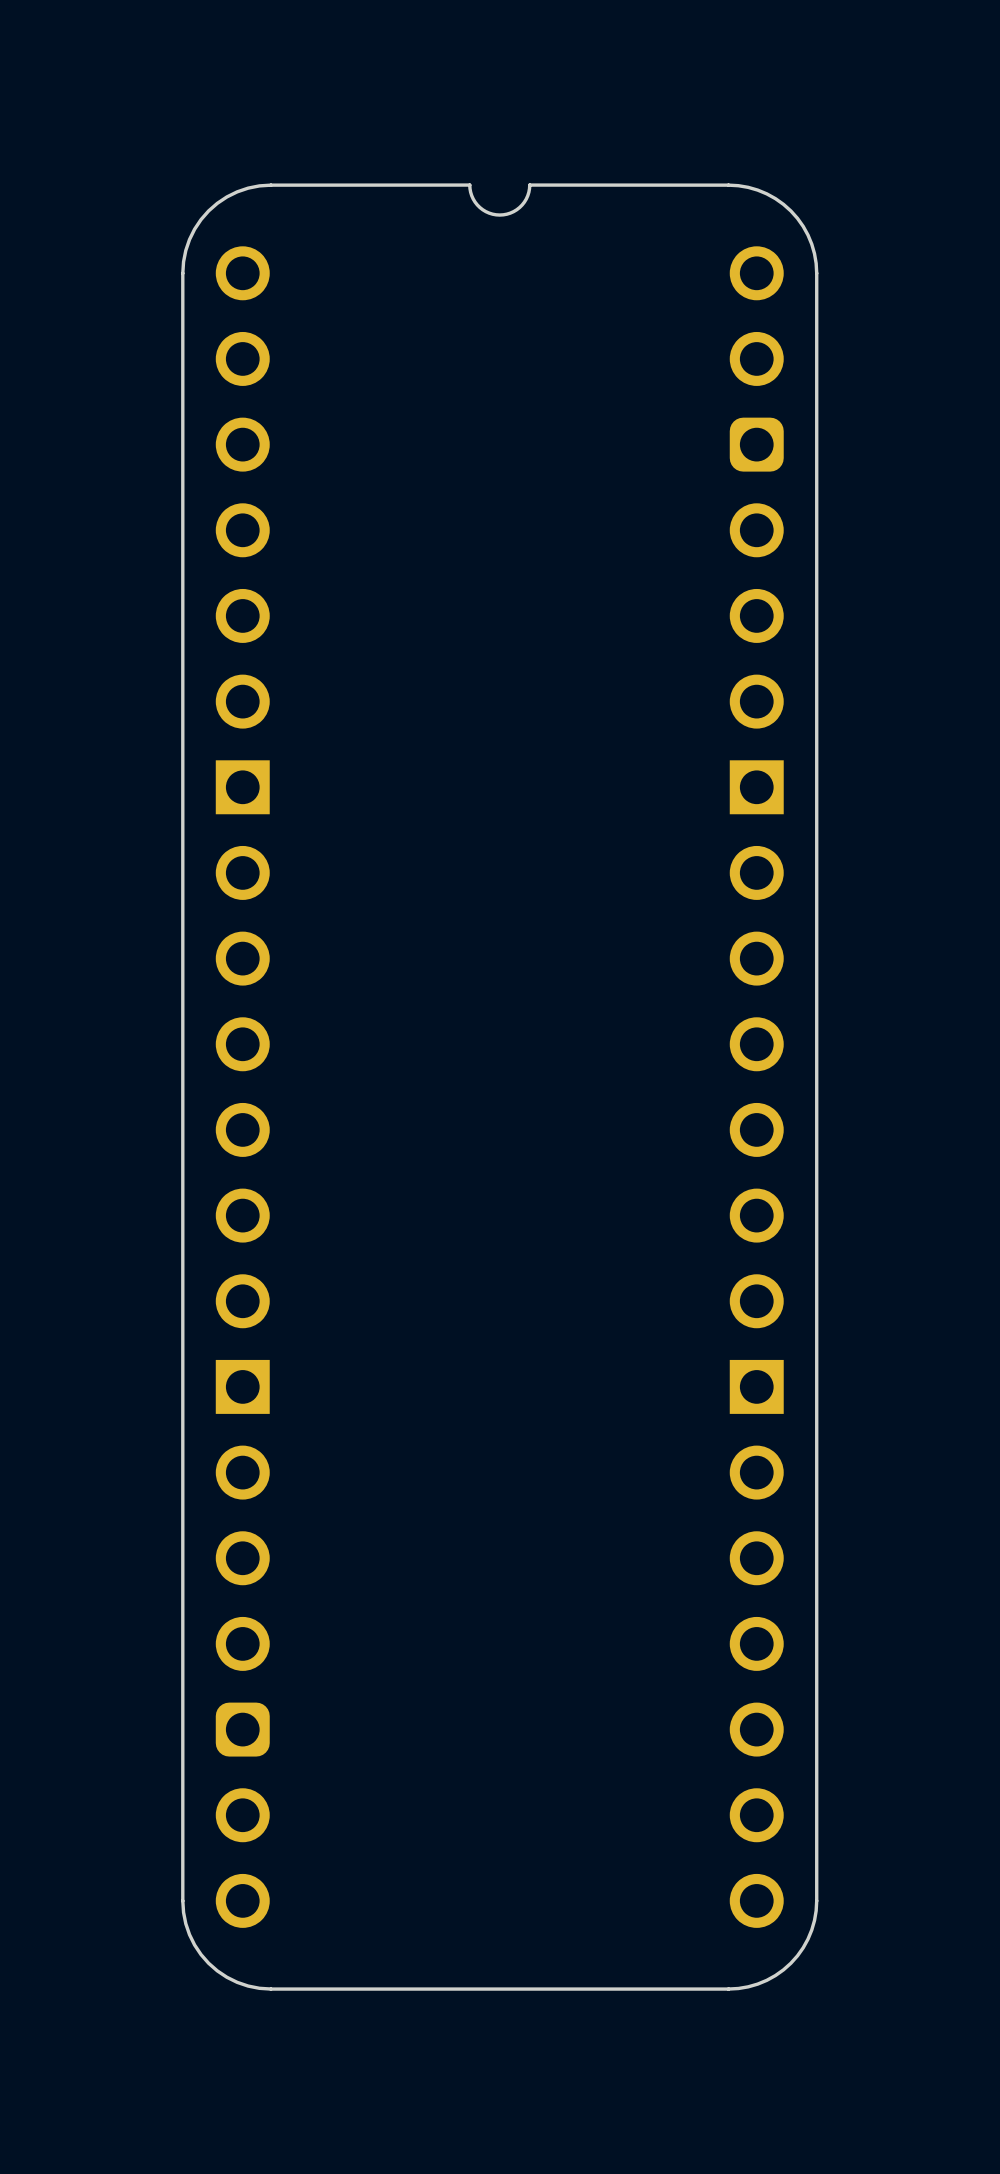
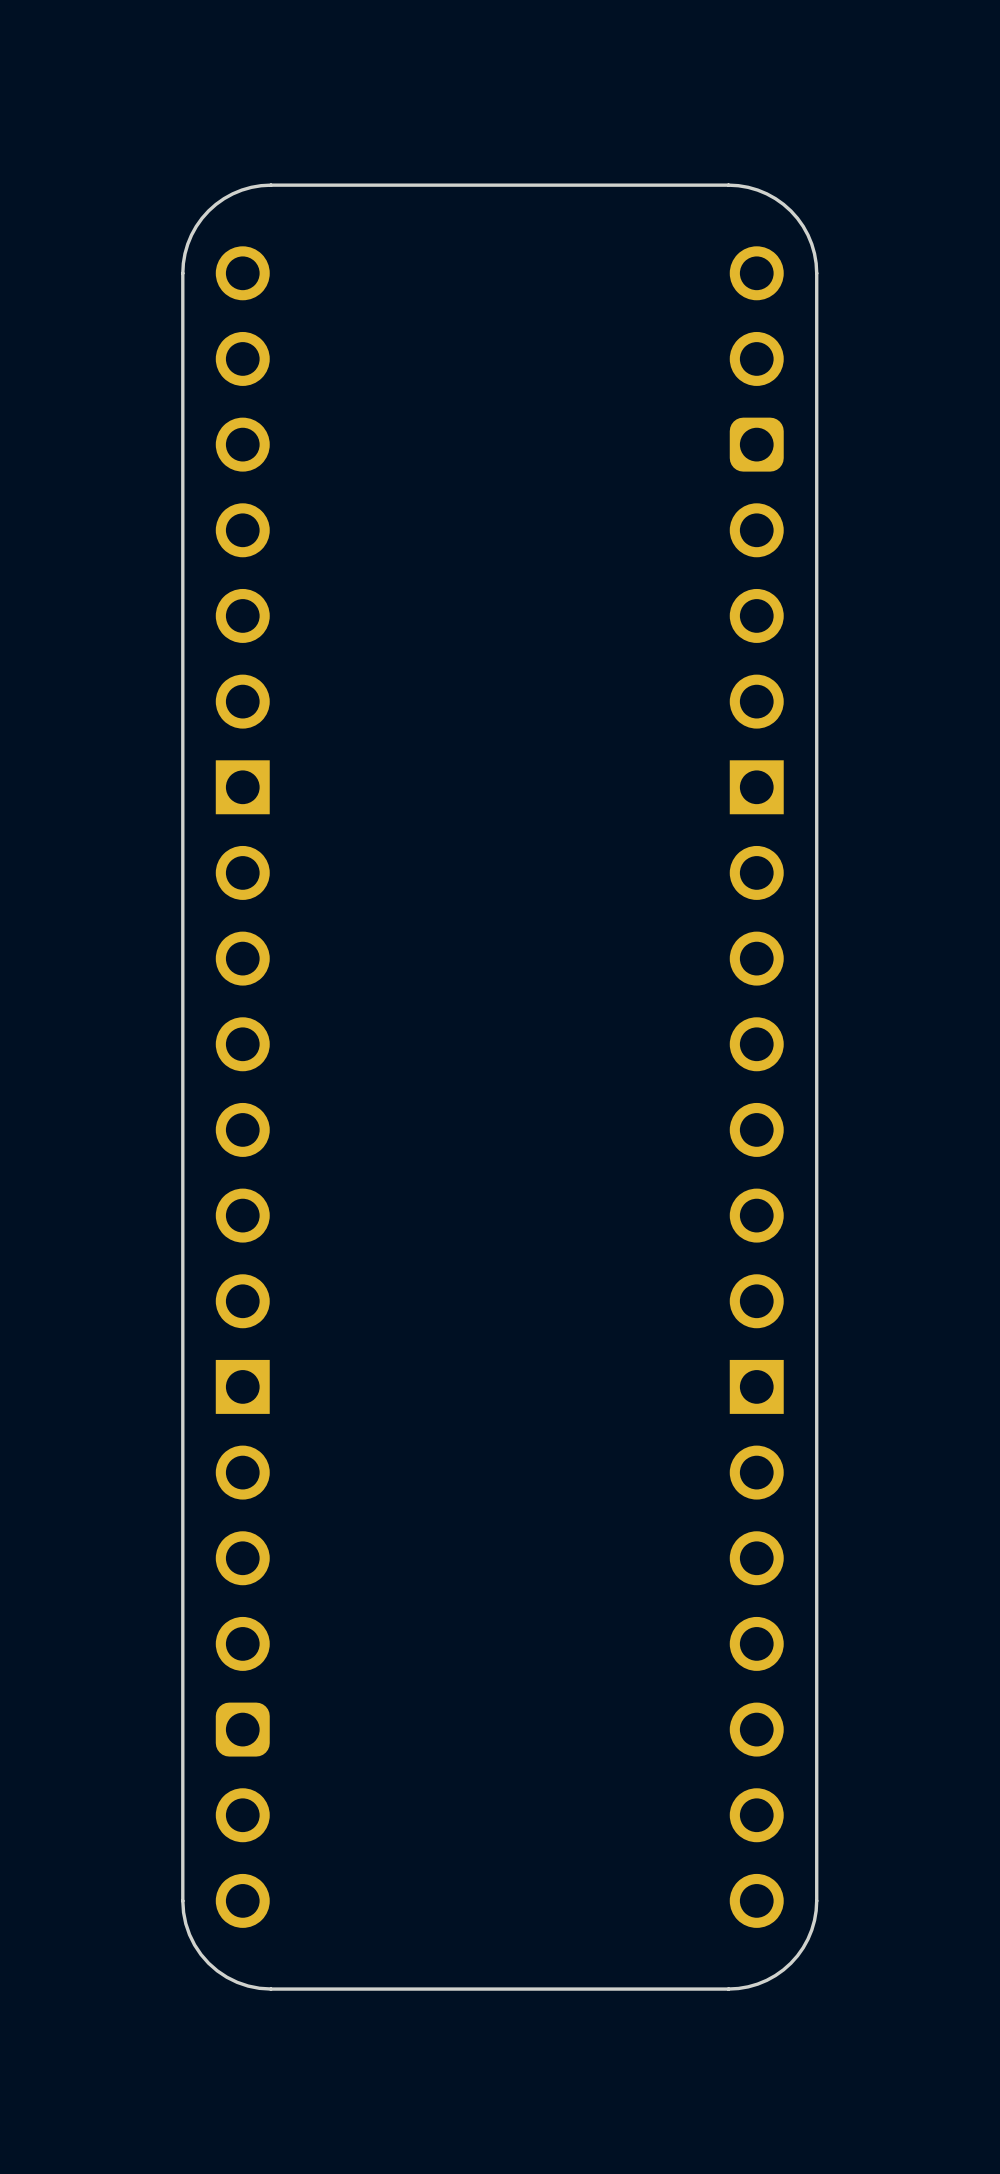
part footprint: [181, 183, 819, 1991] -> [181, 183, 819, 1991]

